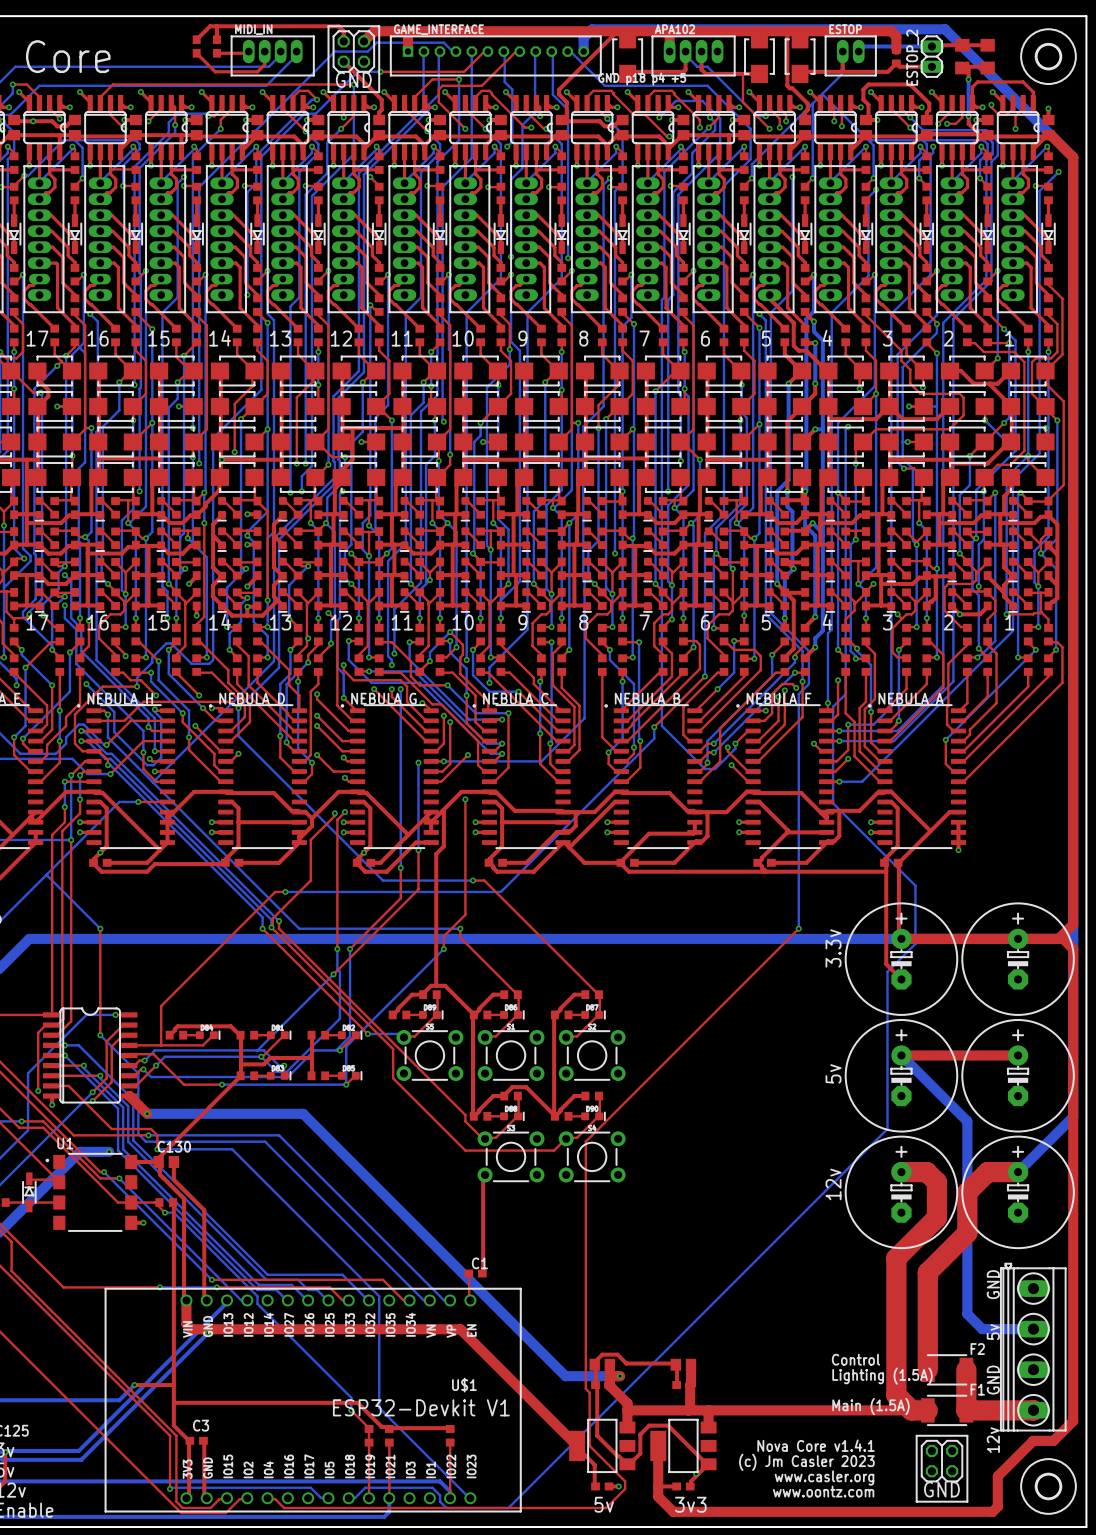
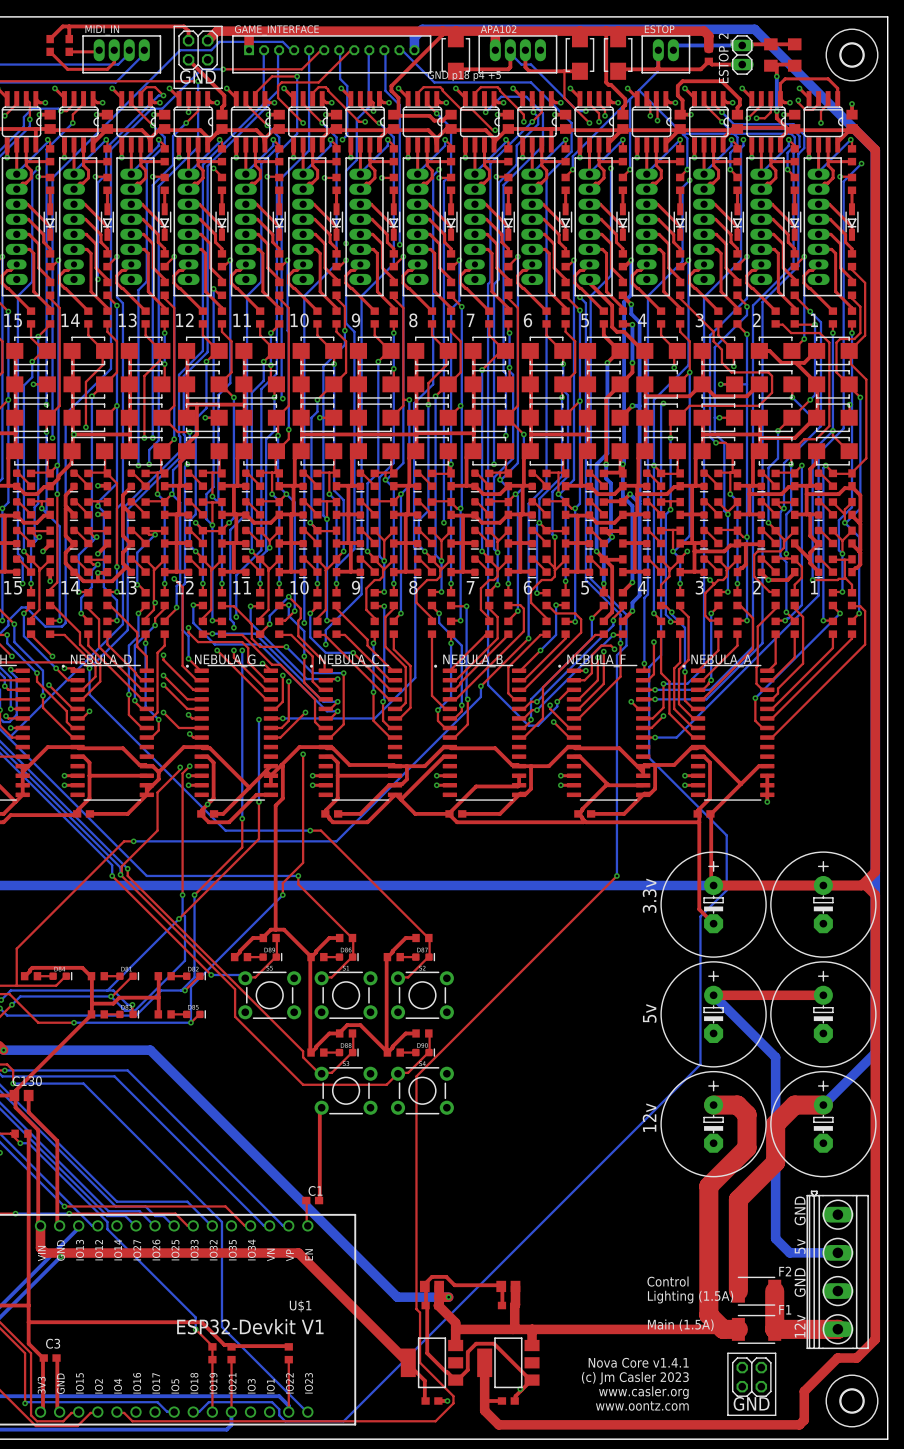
text: 5v (604, 1504) -> none
text: 3v3 (690, 1504) -> none

